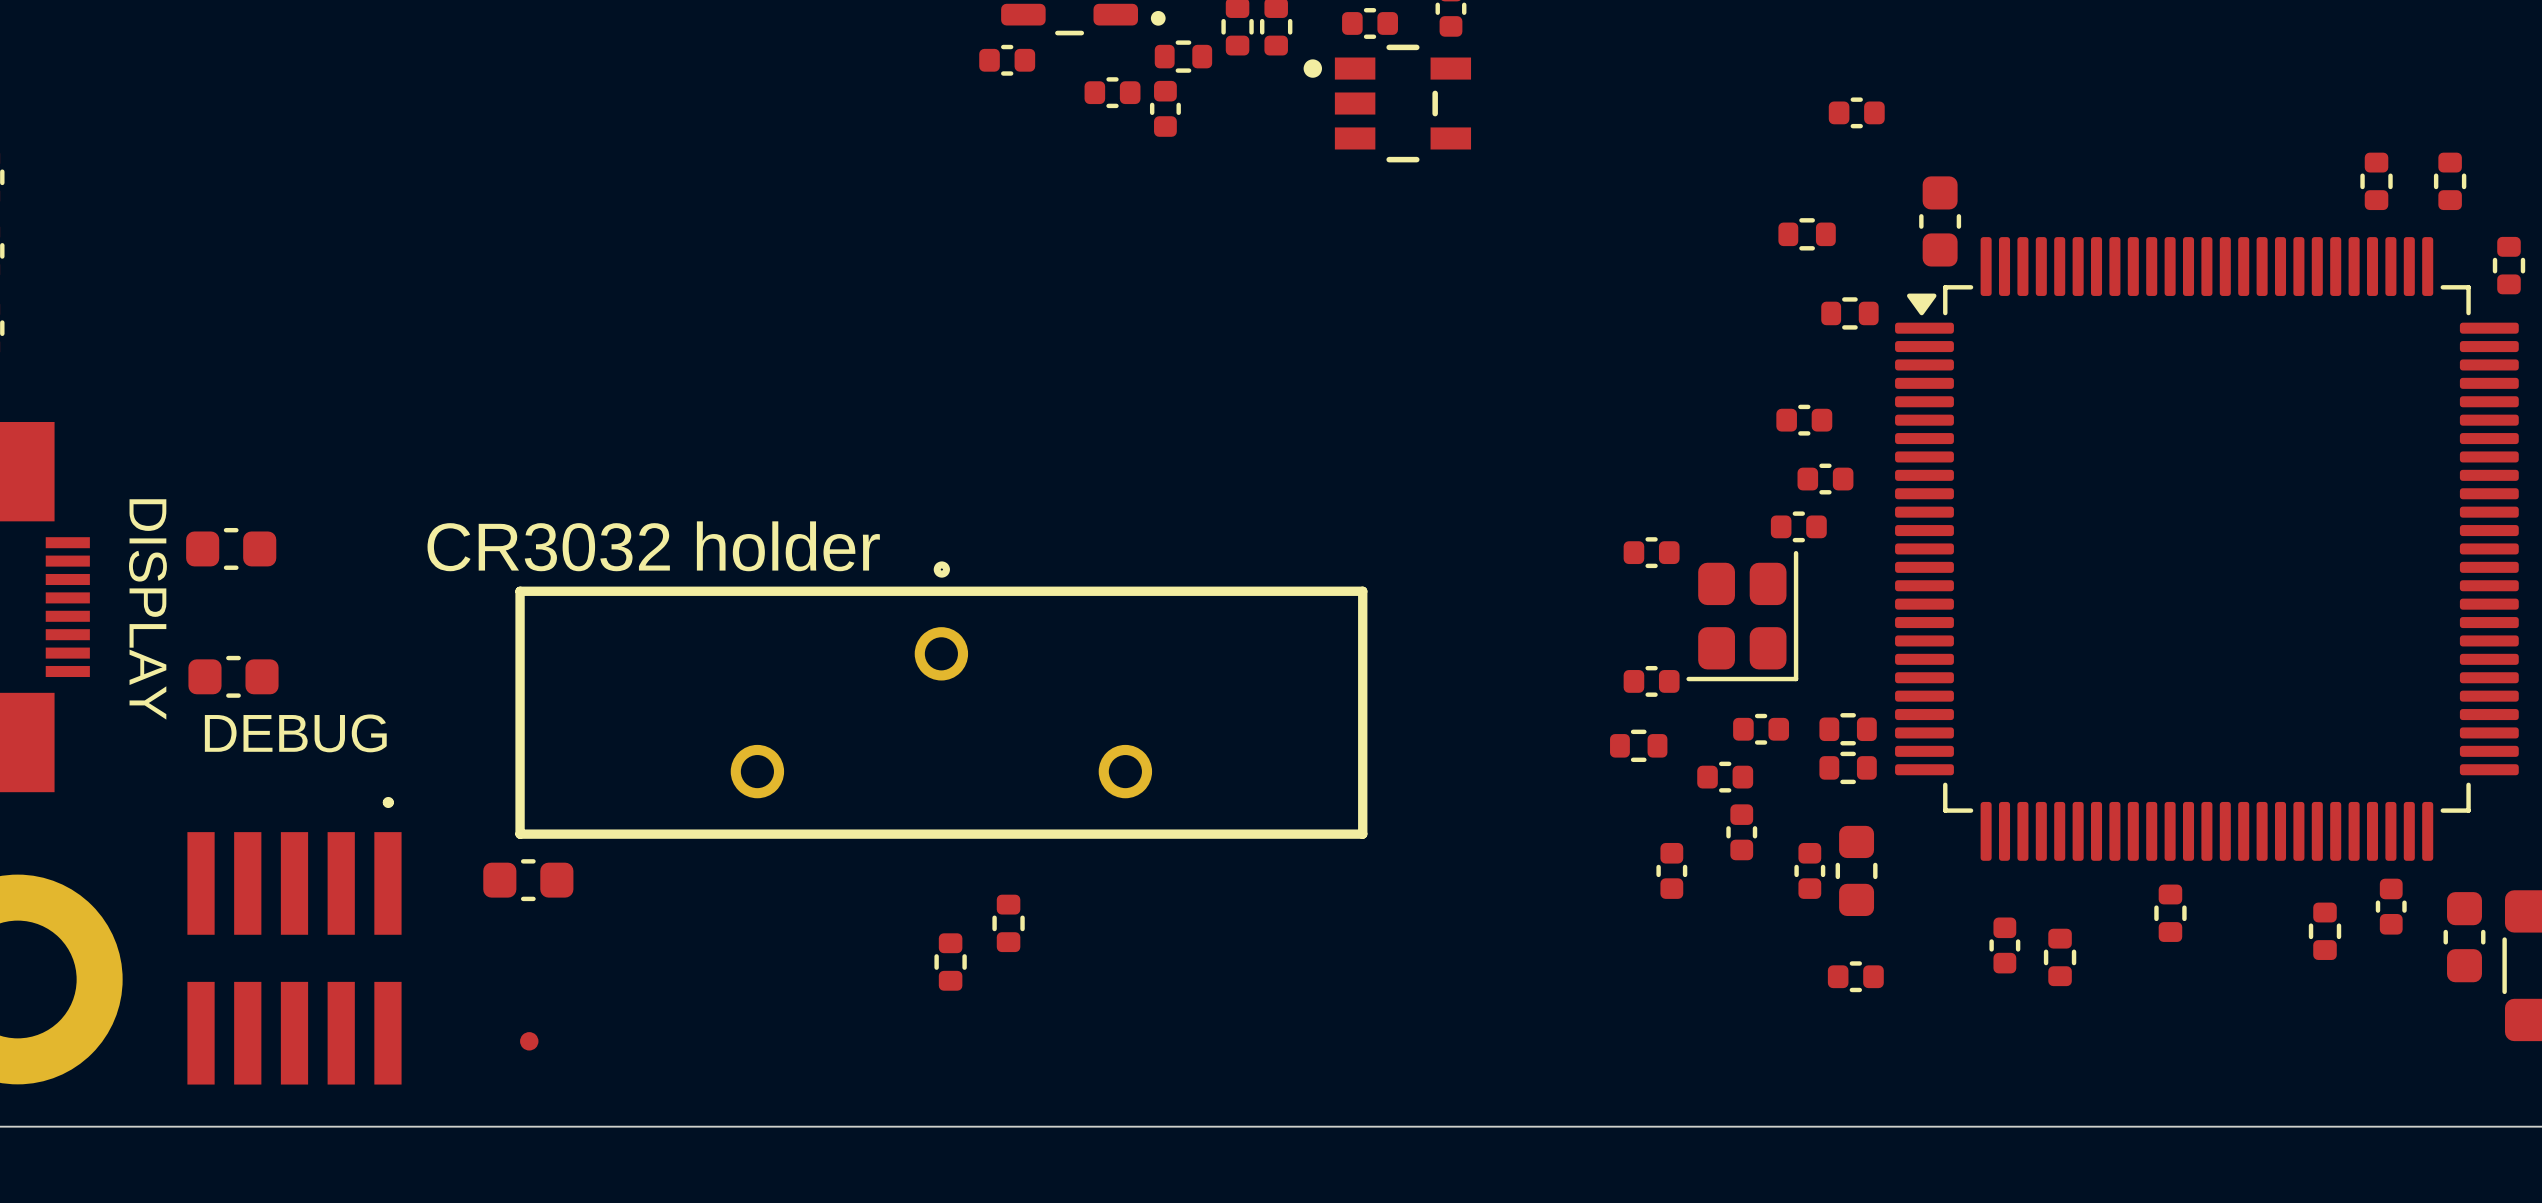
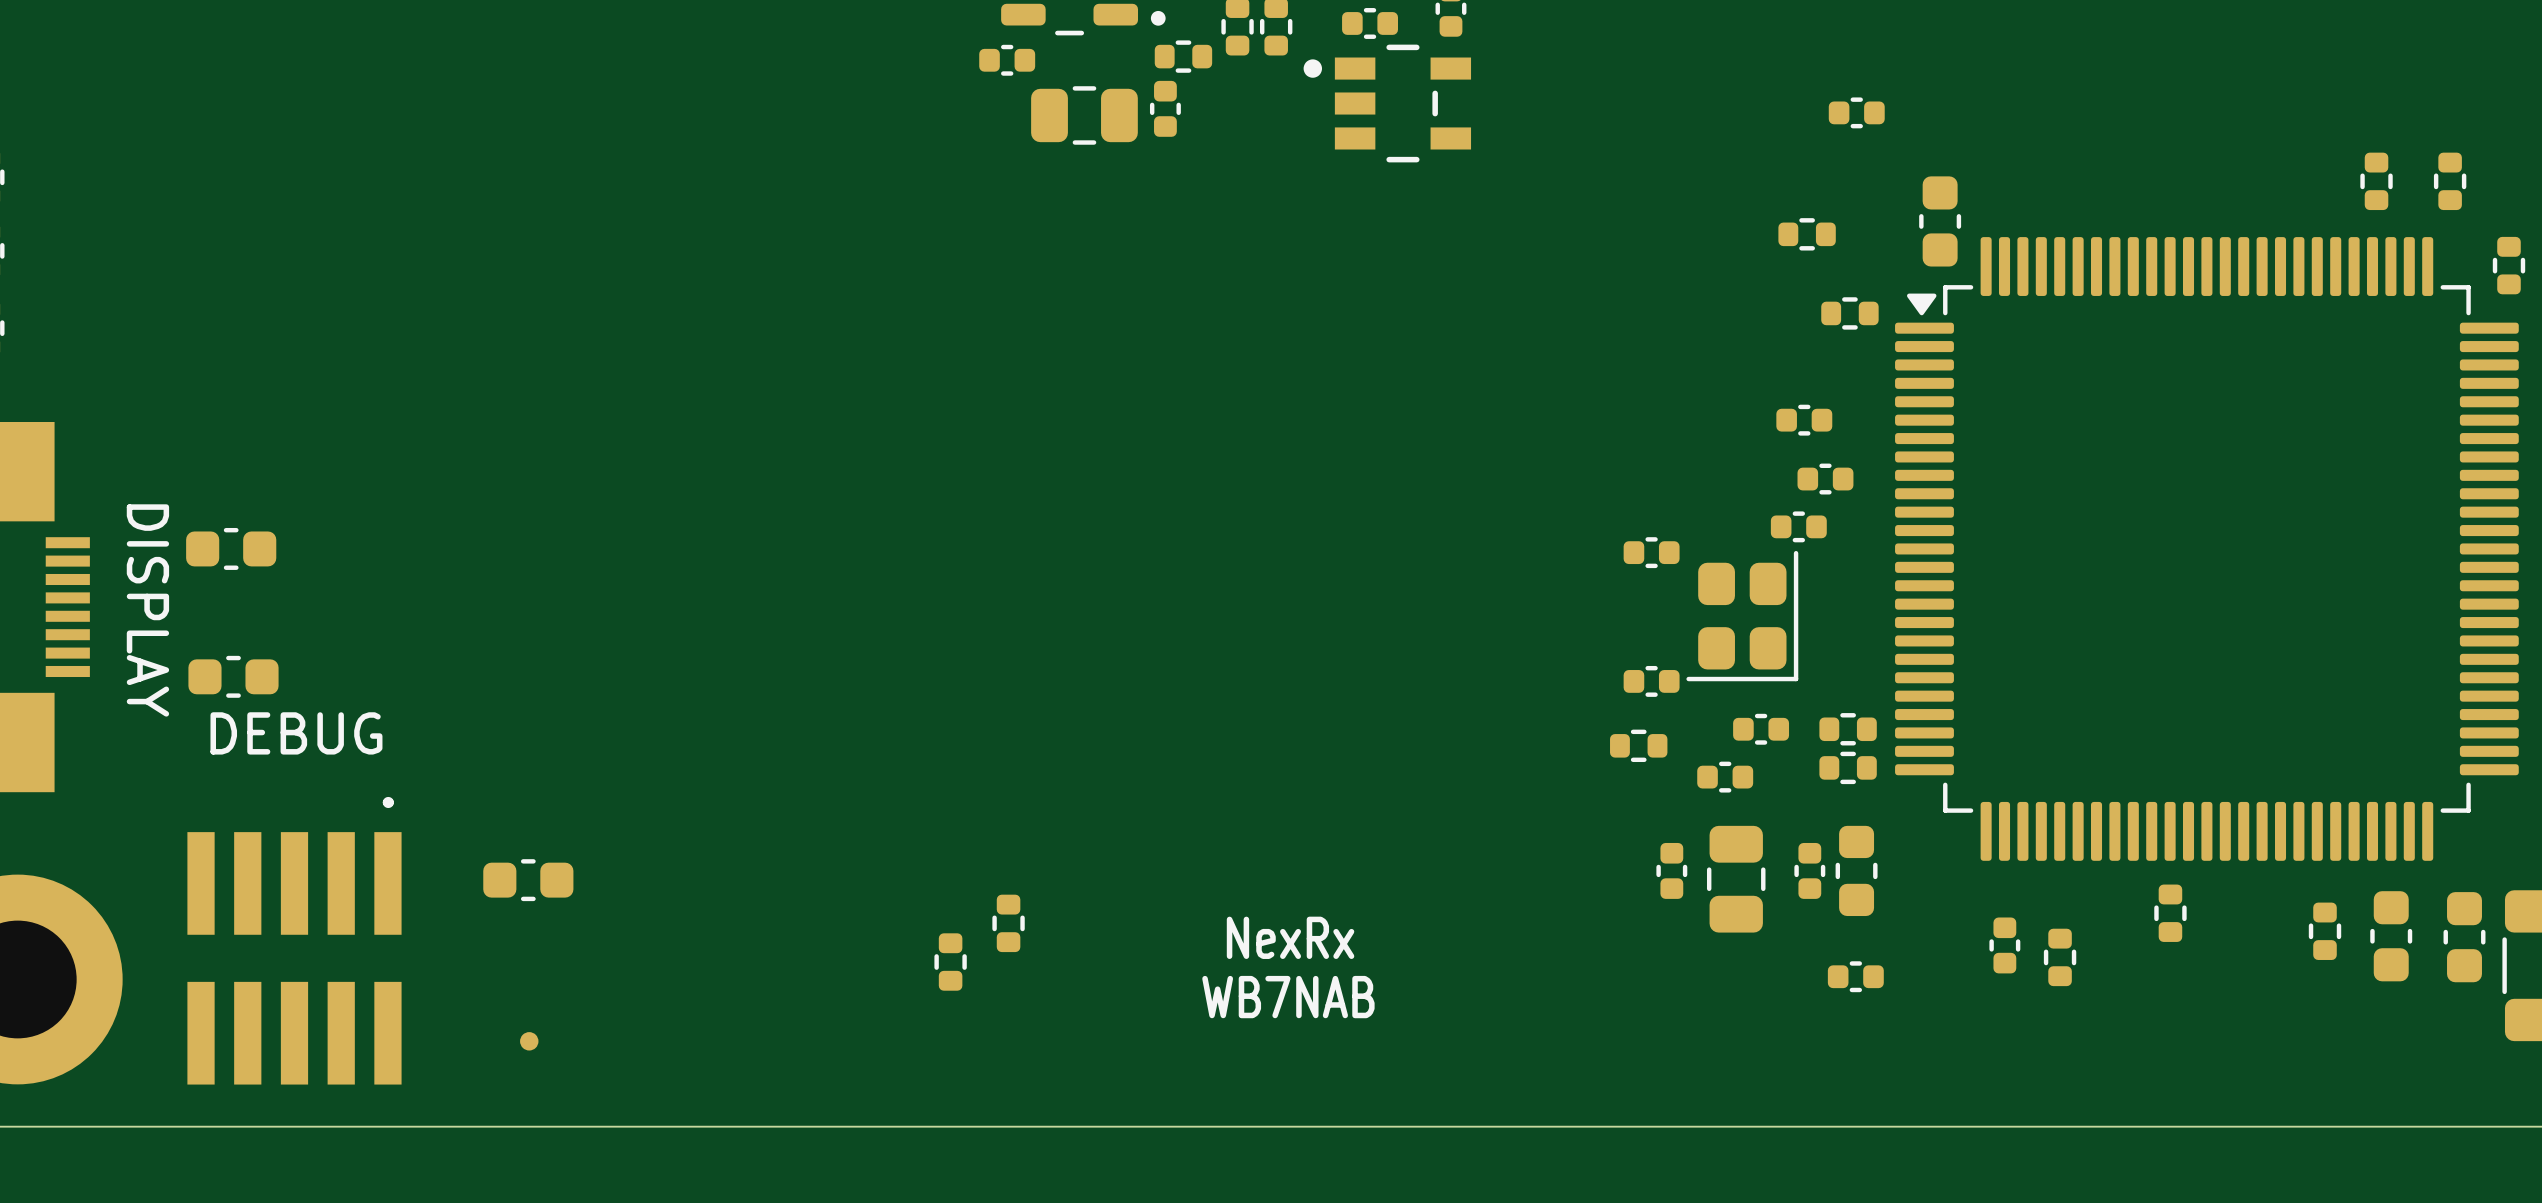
part footprint: [1084, 77, 1141, 109] -> [1031, 86, 1138, 145]
part: CR3032 holder (941, 700) -> none
part: (1741, 832) -> none
part footprint: [2375, 878, 2407, 935] -> [2370, 891, 2413, 982]
part: none -> (1736, 879)
text: none -> NexRx (1290, 937)
text: none -> WB7NAB (1288, 997)

